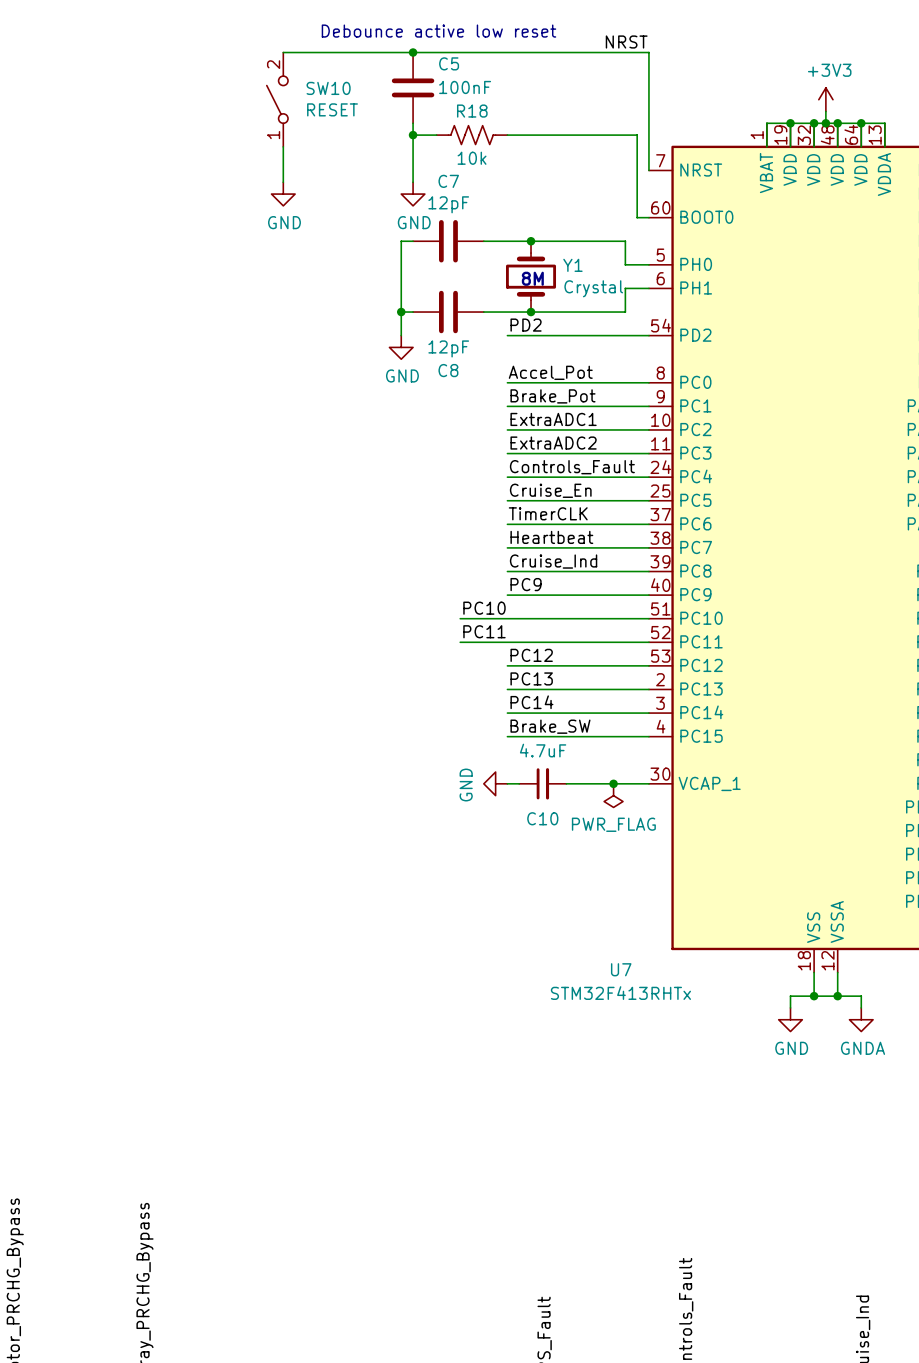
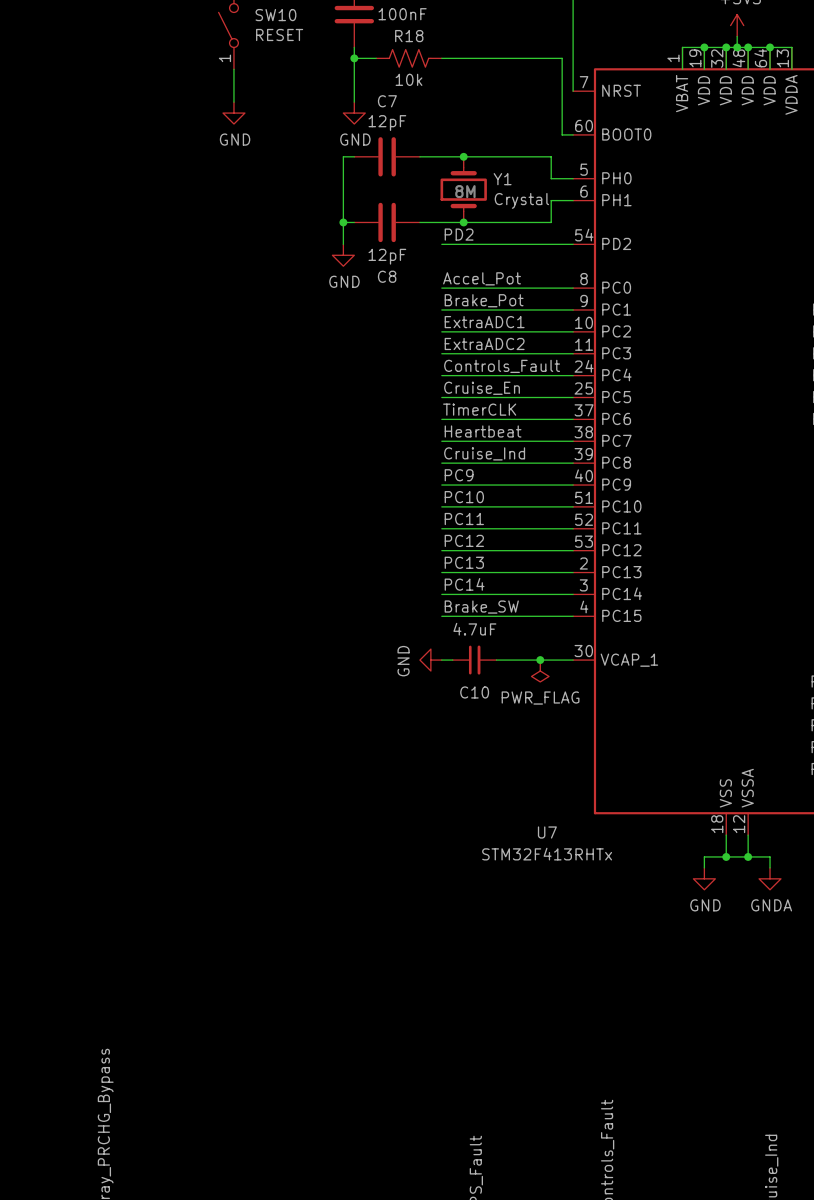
label position: PC10 (484, 608) -> PC10 (464, 497)
wire: (460, 618) (507, 618) -> none
label position: PC11 (484, 631) -> PC11 (464, 519)
wire: (460, 642) (507, 642) -> none

